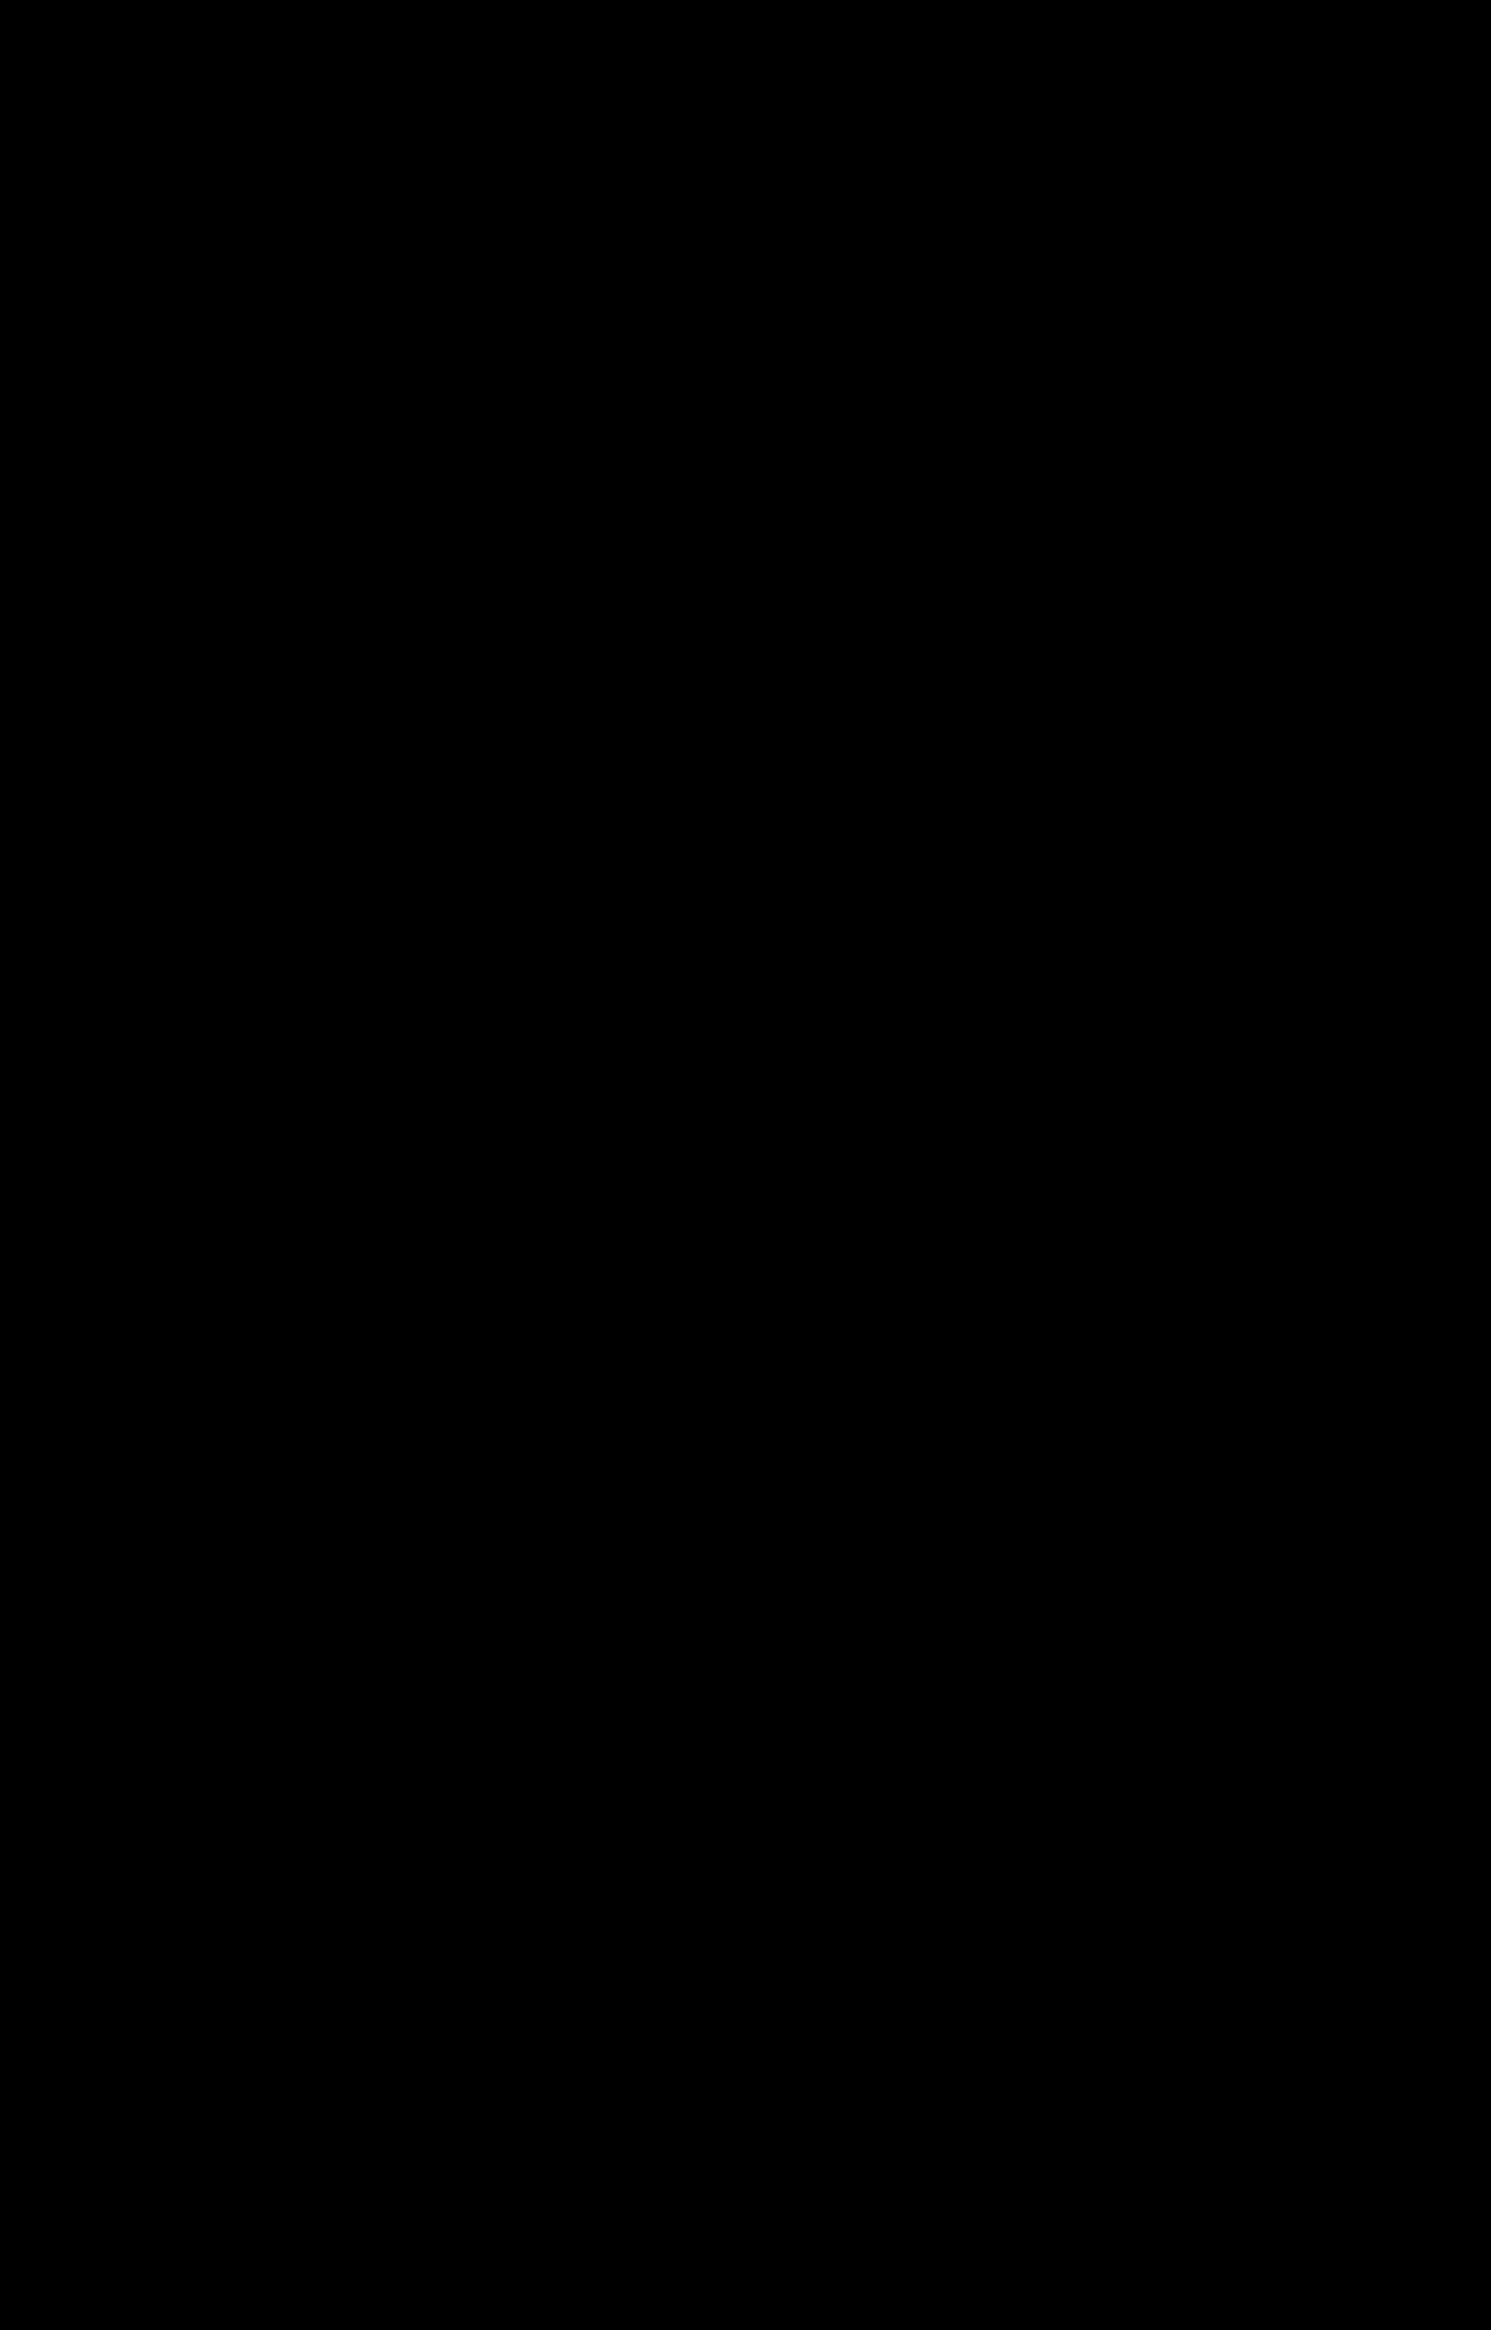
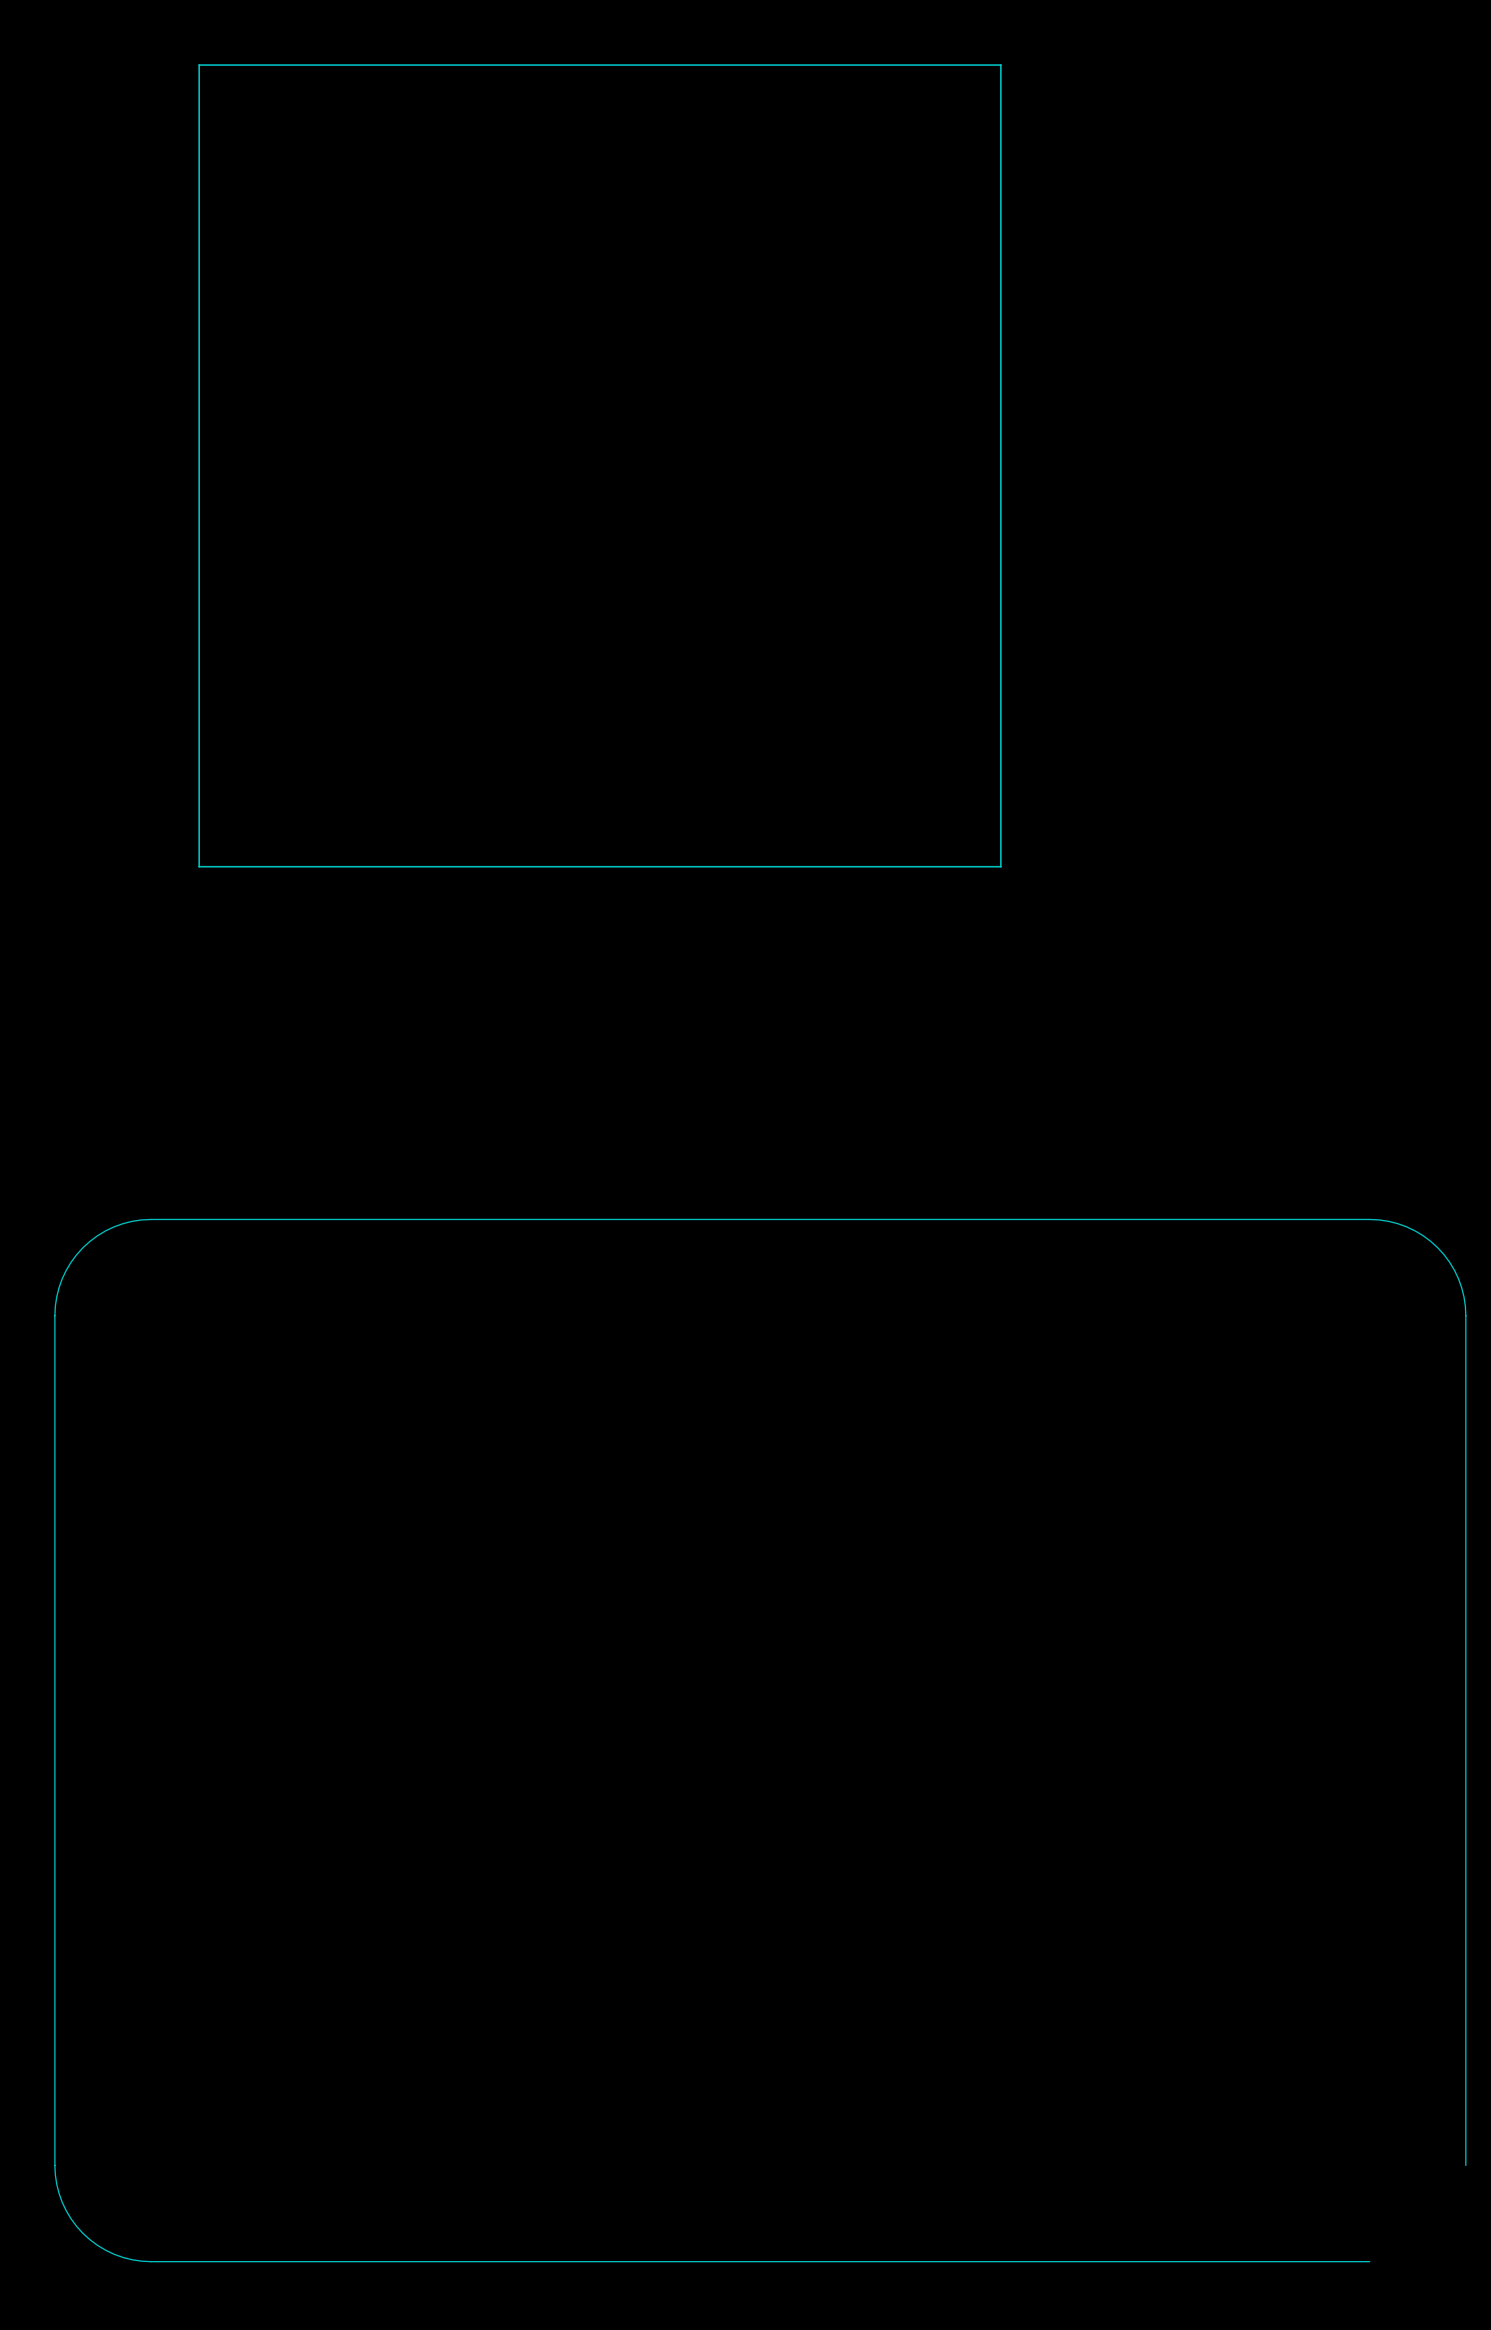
line: none -> (199, 65) (1000, 65) (1000, 866) (199, 866) (199, 65)
line: none -> (1465, 2165) (1465, 1315) (1461, 1287) (1454, 1270) (1444, 1254) (1423, 1235) (1397, 1223) (1369, 1219) (151, 1219) (123, 1223) (105, 1230) (90, 1241) (76, 1254) (62, 1278) (56, 1296) (54, 1315) (54, 2165) (59, 2193) (66, 2210) (76, 2226) (90, 2239) (105, 2250) (123, 2257) (151, 2261) (1369, 2261)

